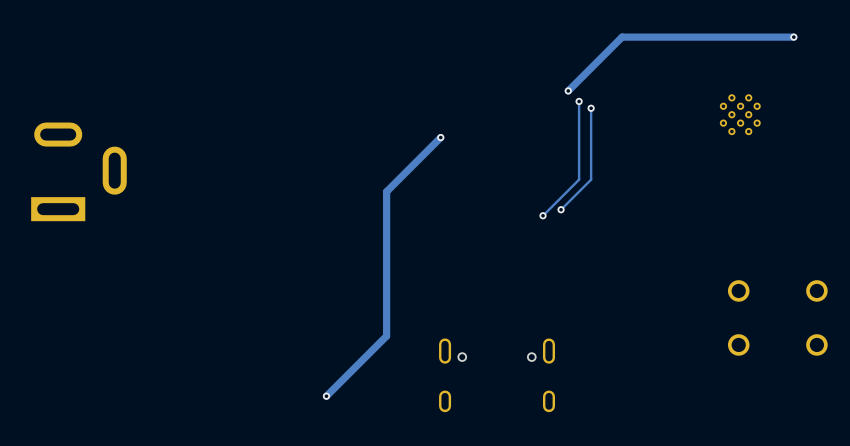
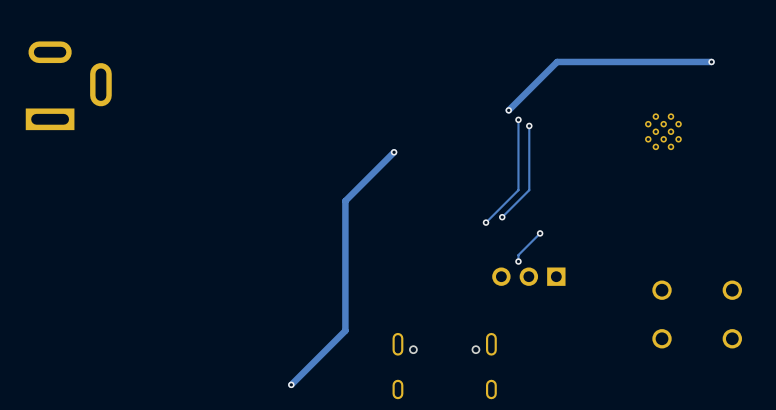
part position: (78, 171) -> (68, 85)
track: none -> (540, 233) (518, 255) (518, 261)
via: none -> (540, 233)
via: none -> (518, 261)
part: none -> (528, 276)

